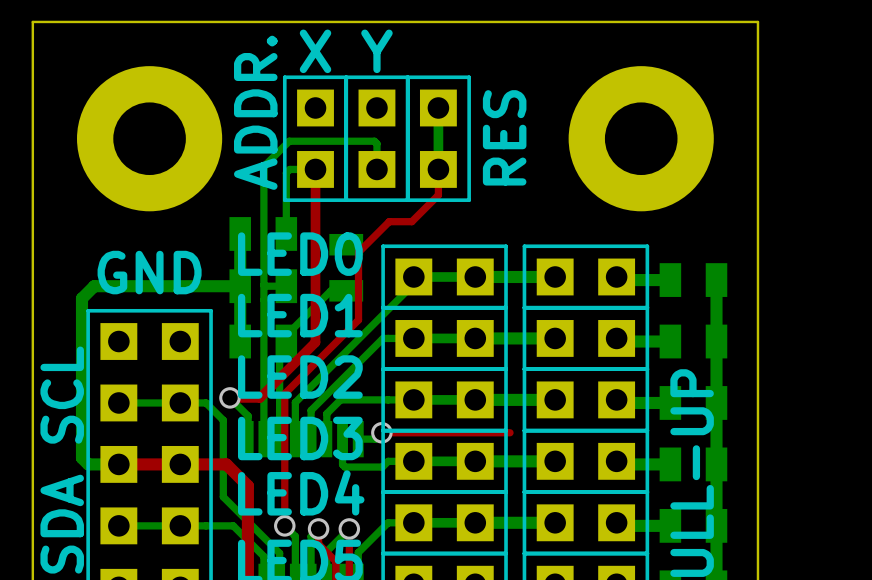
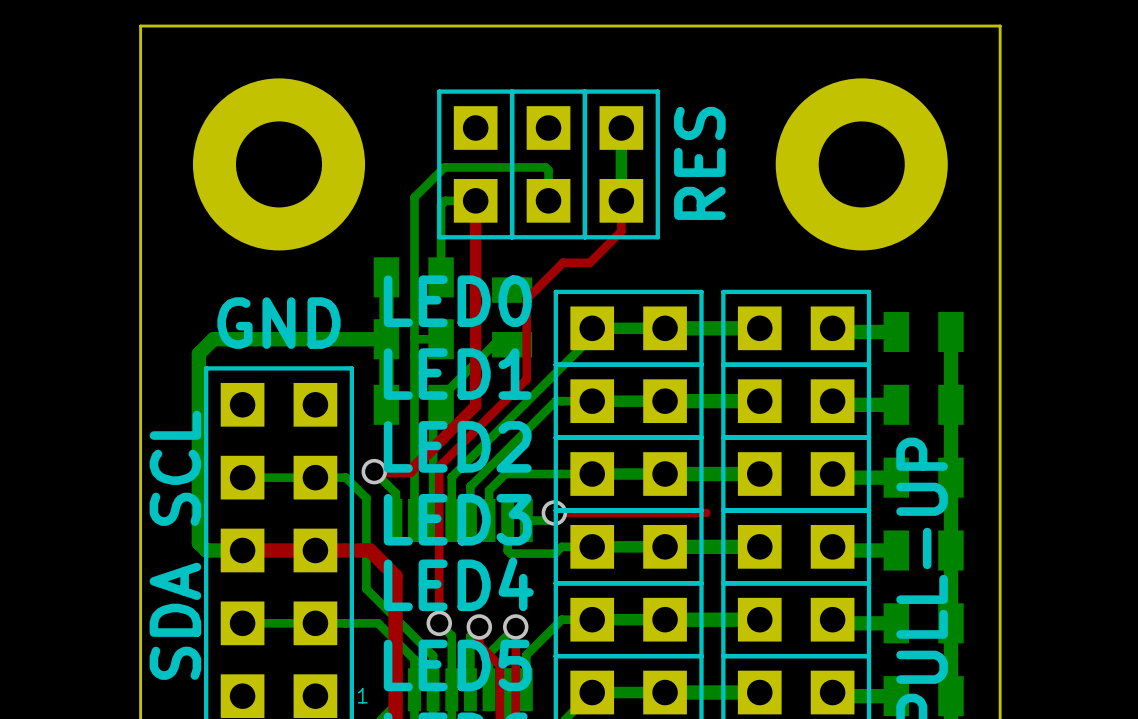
text: X (315, 51) -> none
text: Y (376, 51) -> none
text: ADDR. (255, 112) -> none

